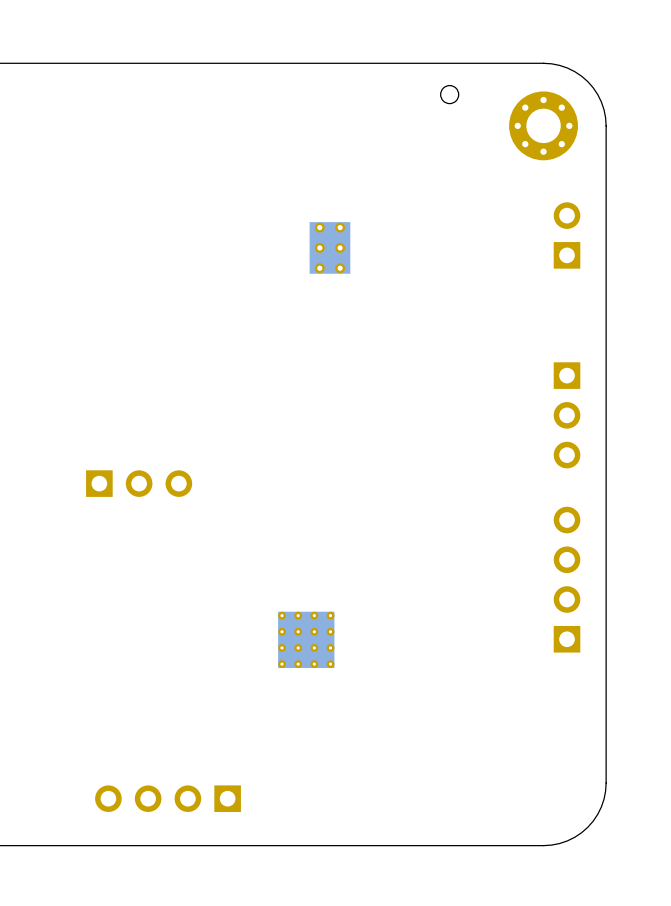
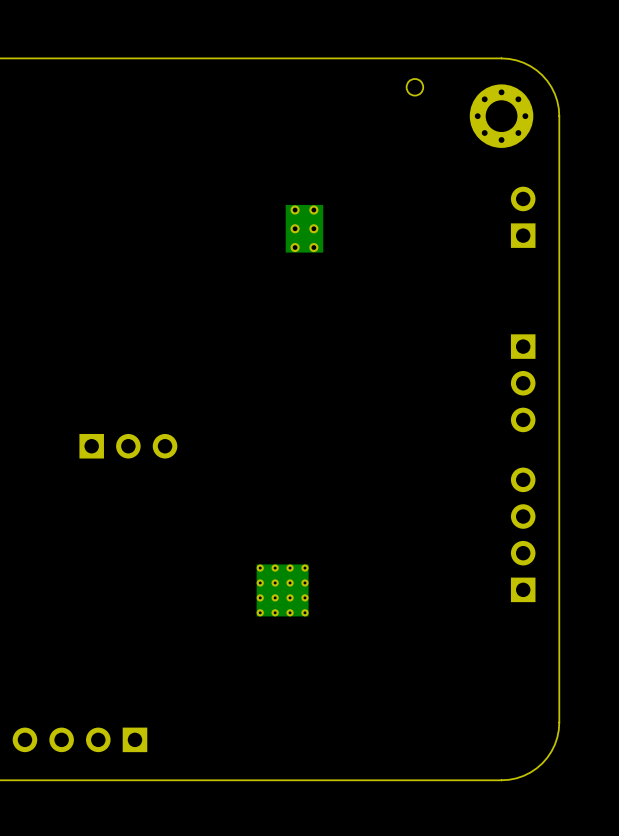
part position: (168, 798) -> (79, 739)

